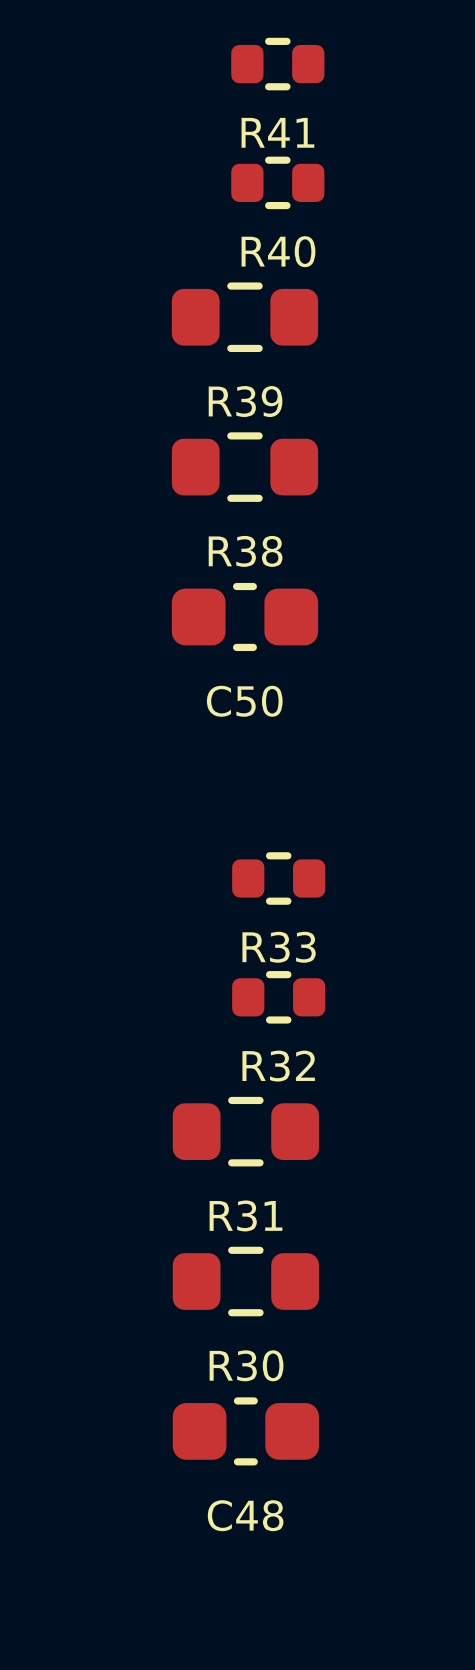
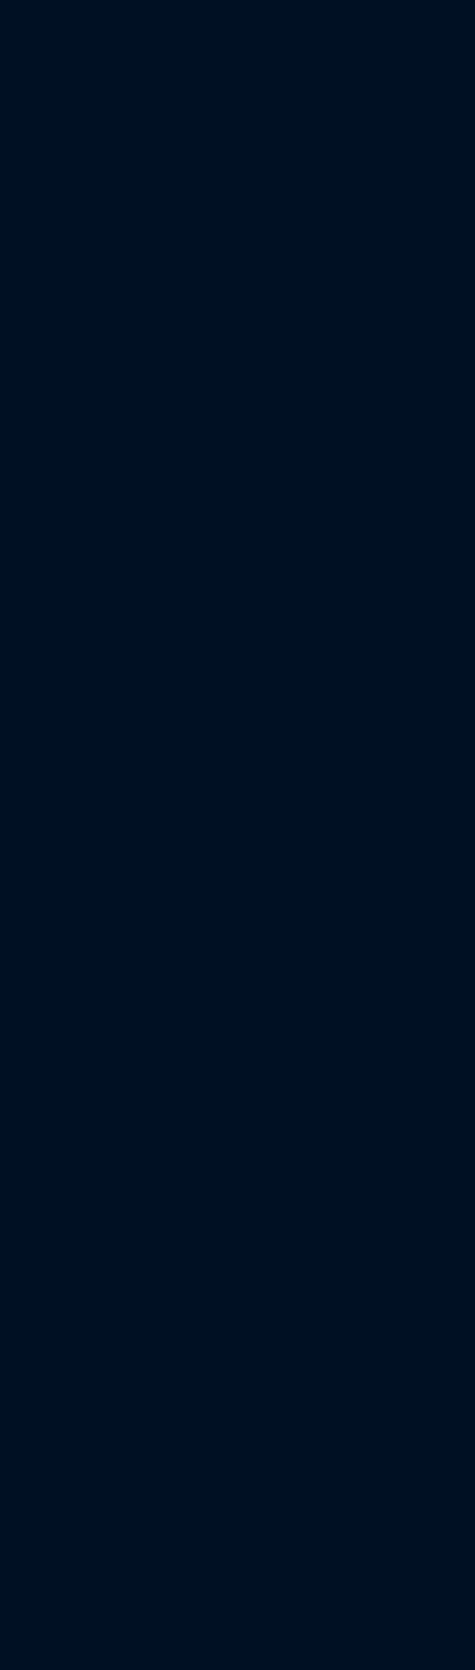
R41: (277, 64) -> none
R40: (277, 182) -> none
R39: (244, 317) -> none
R38: (244, 467) -> none
C50: (244, 616) -> none
R33: (278, 878) -> none
R32: (278, 997) -> none
R31: (245, 1131) -> none
R30: (245, 1281) -> none
C48: (245, 1431) -> none

